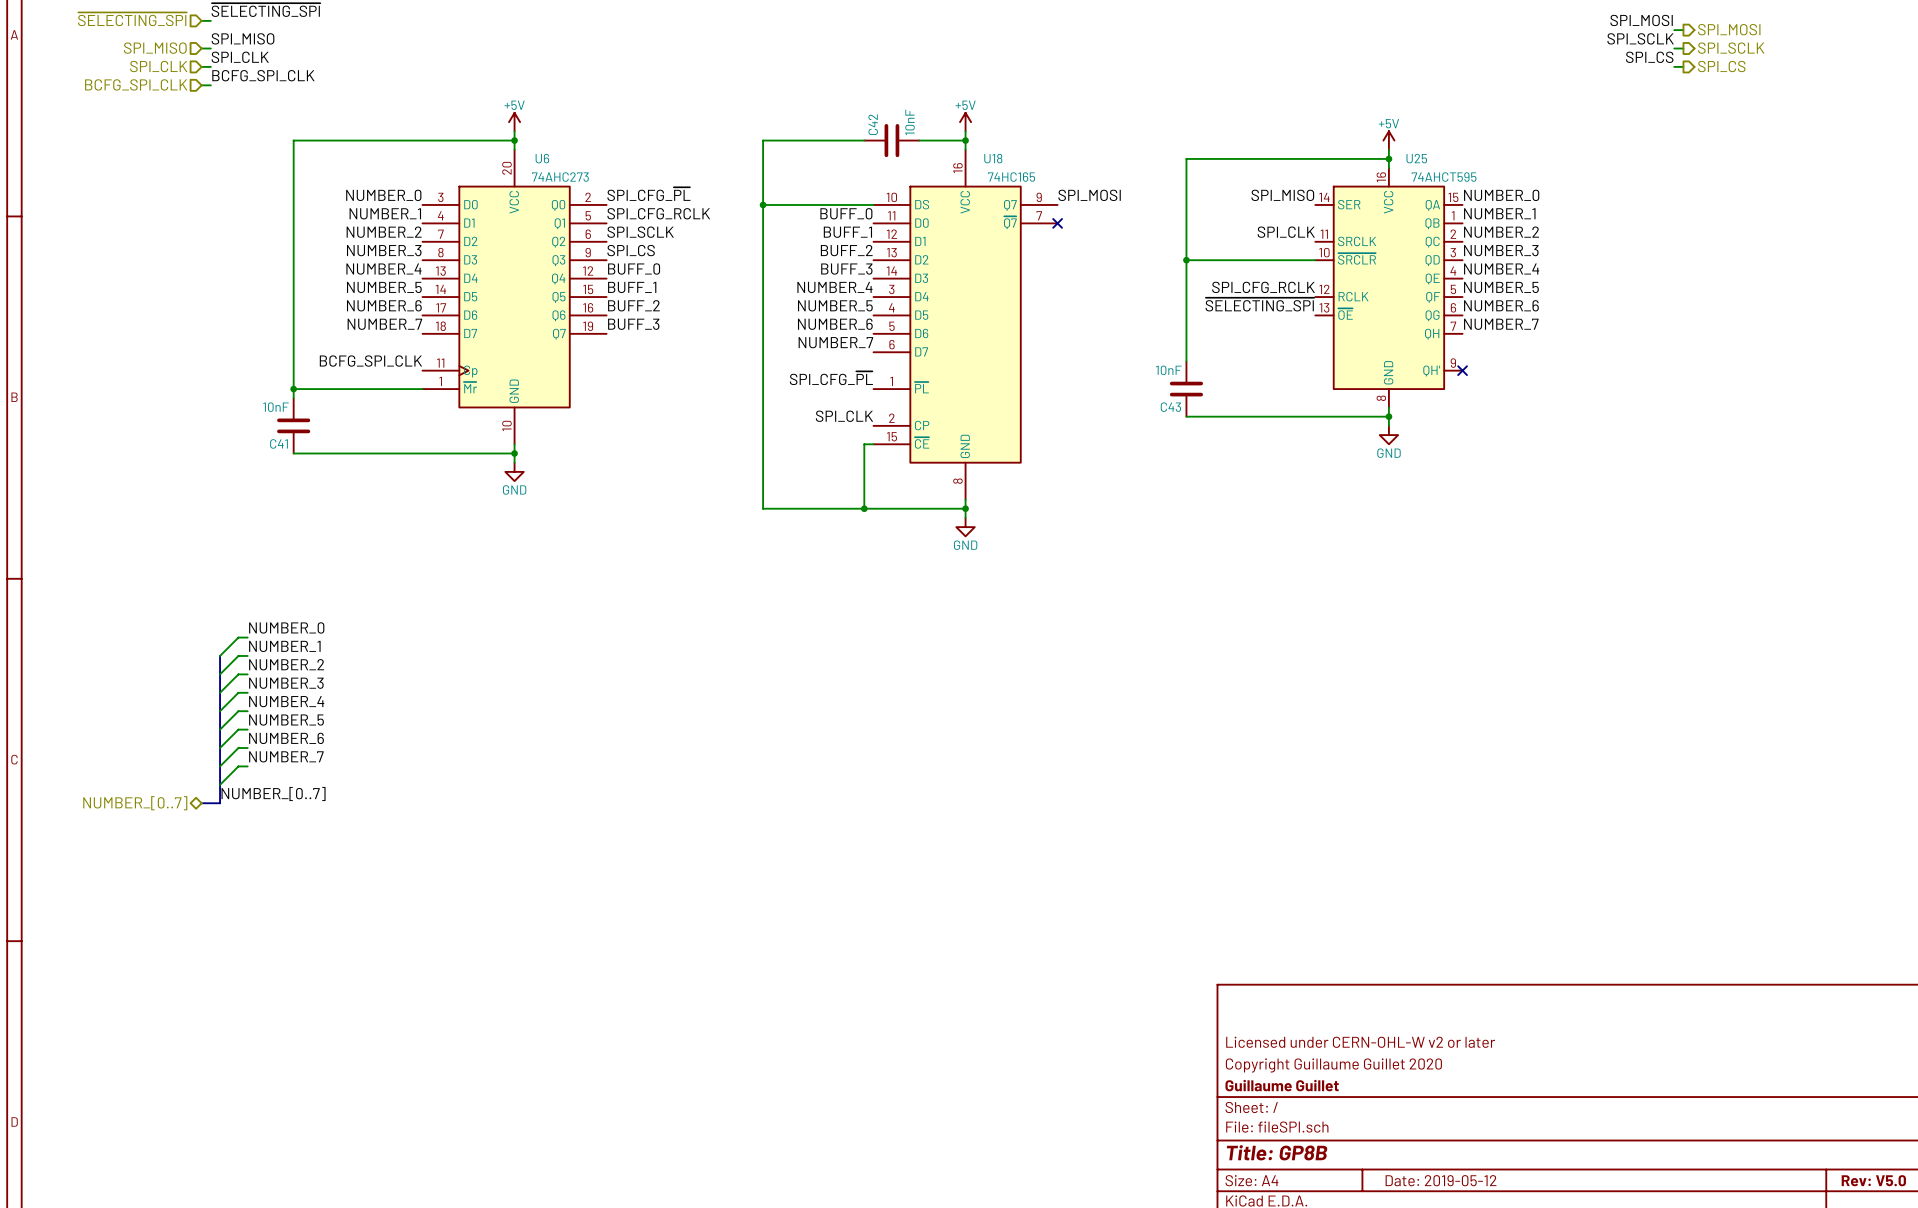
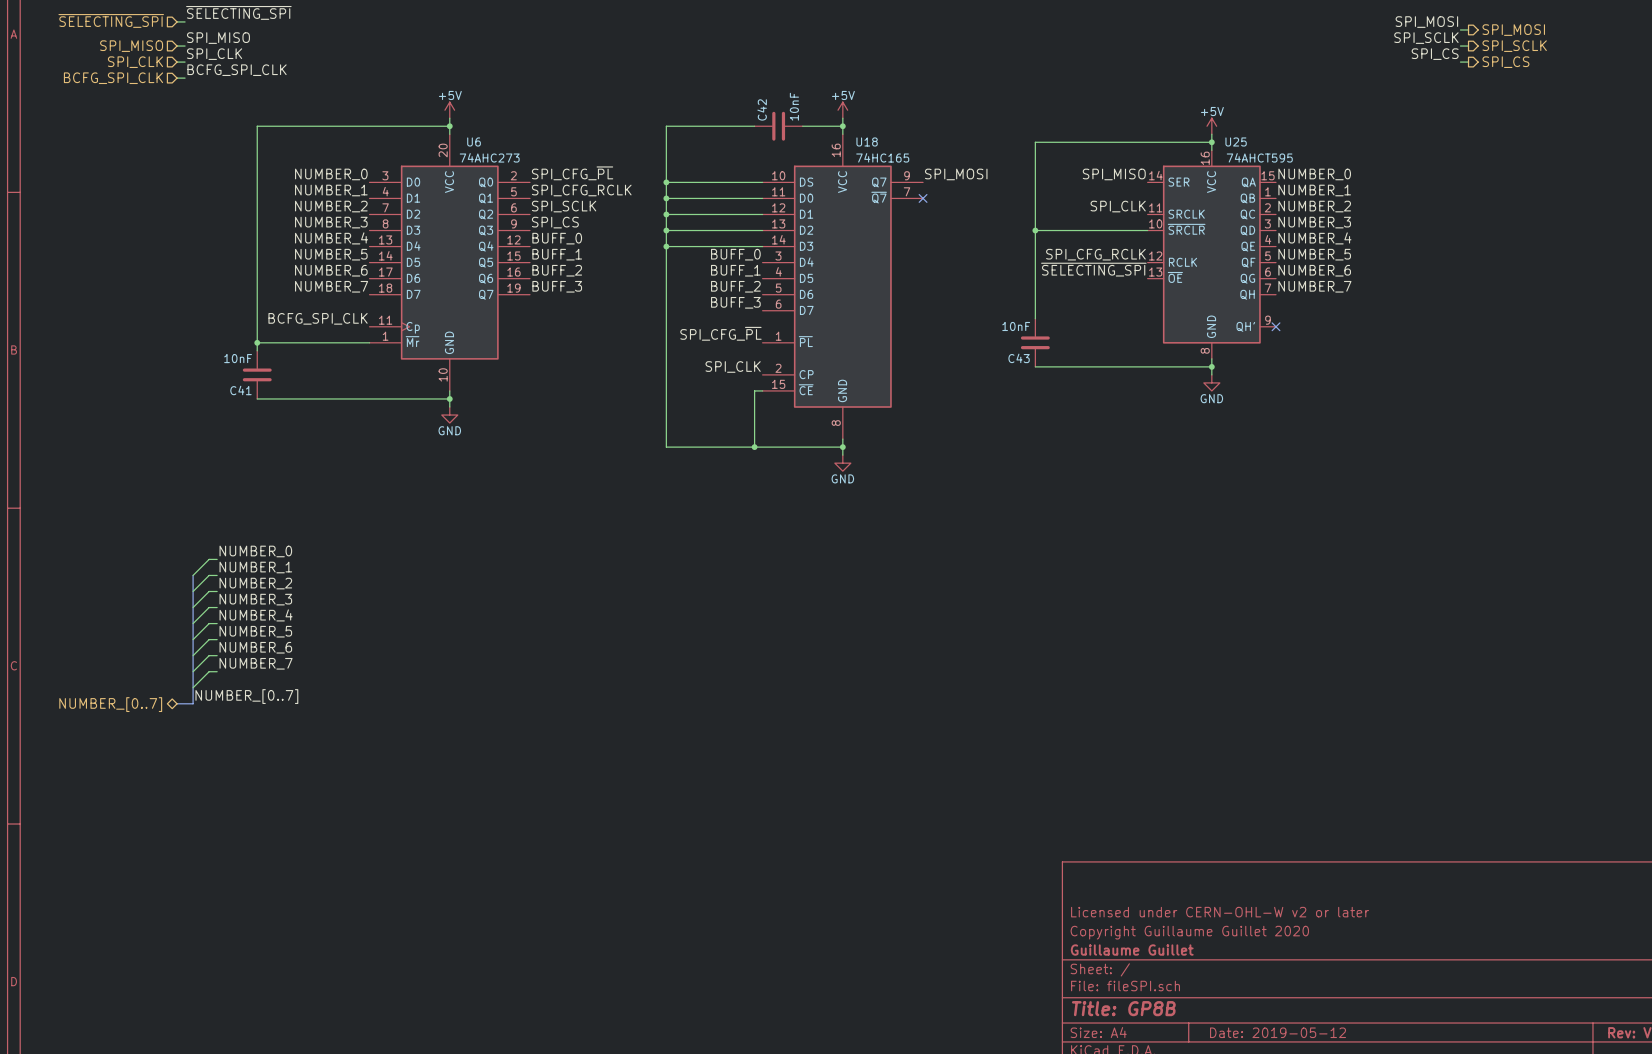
label: BUFF_0 (846, 213) -> none
wire: none -> (666, 198) (762, 198)
junction: none -> (666, 198)
label: BUFF_1 (847, 232) -> none
wire: none -> (666, 214) (762, 214)
junction: none -> (666, 214)
label: BUFF_2 (846, 250) -> none
wire: none -> (666, 230) (762, 230)
junction: none -> (666, 230)
label: BUFF_3 (846, 269) -> none
wire: none -> (666, 246) (762, 246)
junction: none -> (666, 246)
label: NUMBER_4 (834, 287) -> BUFF_0 (735, 254)
label: NUMBER_5 (835, 305) -> BUFF_1 (735, 270)
label: NUMBER_6 (835, 324) -> BUFF_2 (735, 286)
label: NUMBER_7 (835, 342) -> BUFF_3 (735, 302)

